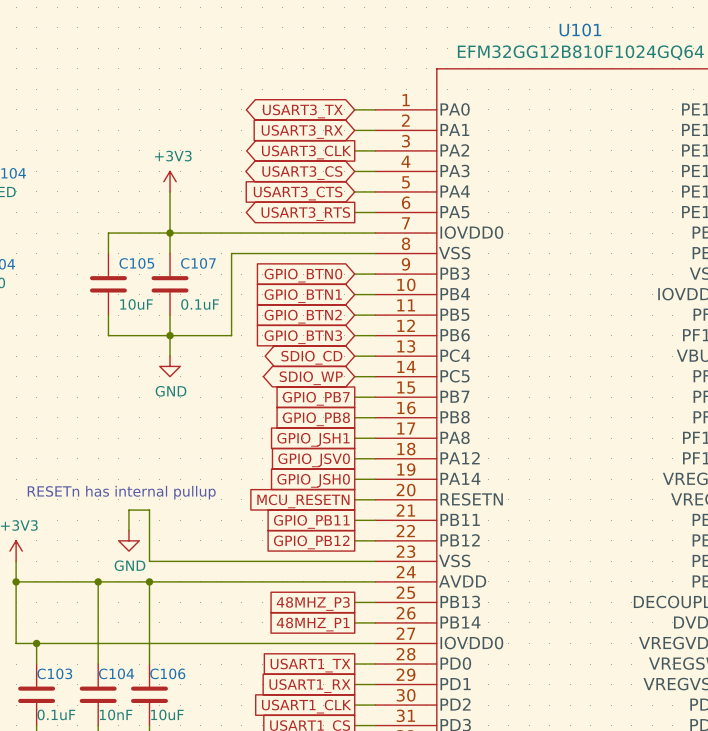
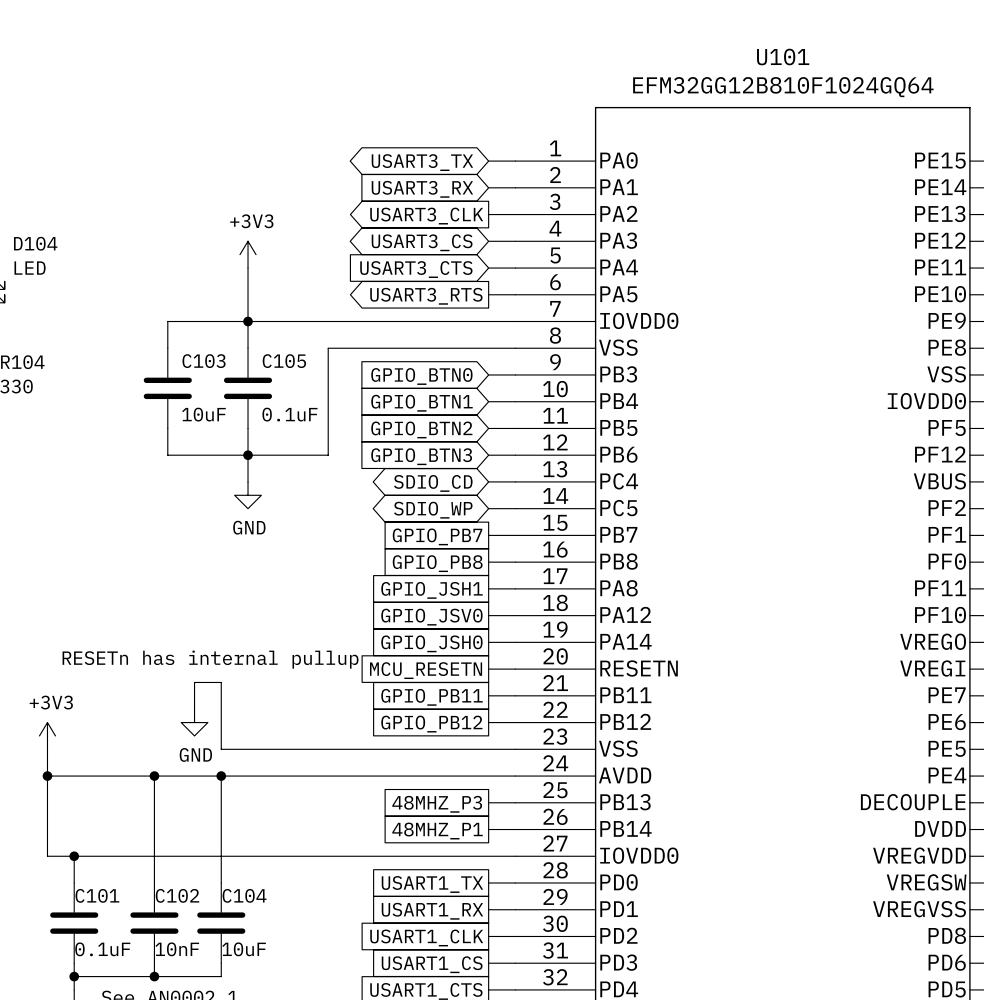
C105 name: C105 (136, 263) -> C103 (204, 361)
C107 name: C107 (198, 263) -> C105 (284, 361)
C103 name: C103 (54, 673) -> C101 (97, 895)
C104 name: C104 (116, 673) -> C102 (177, 895)
C106 name: C106 (167, 673) -> C104 (244, 895)

